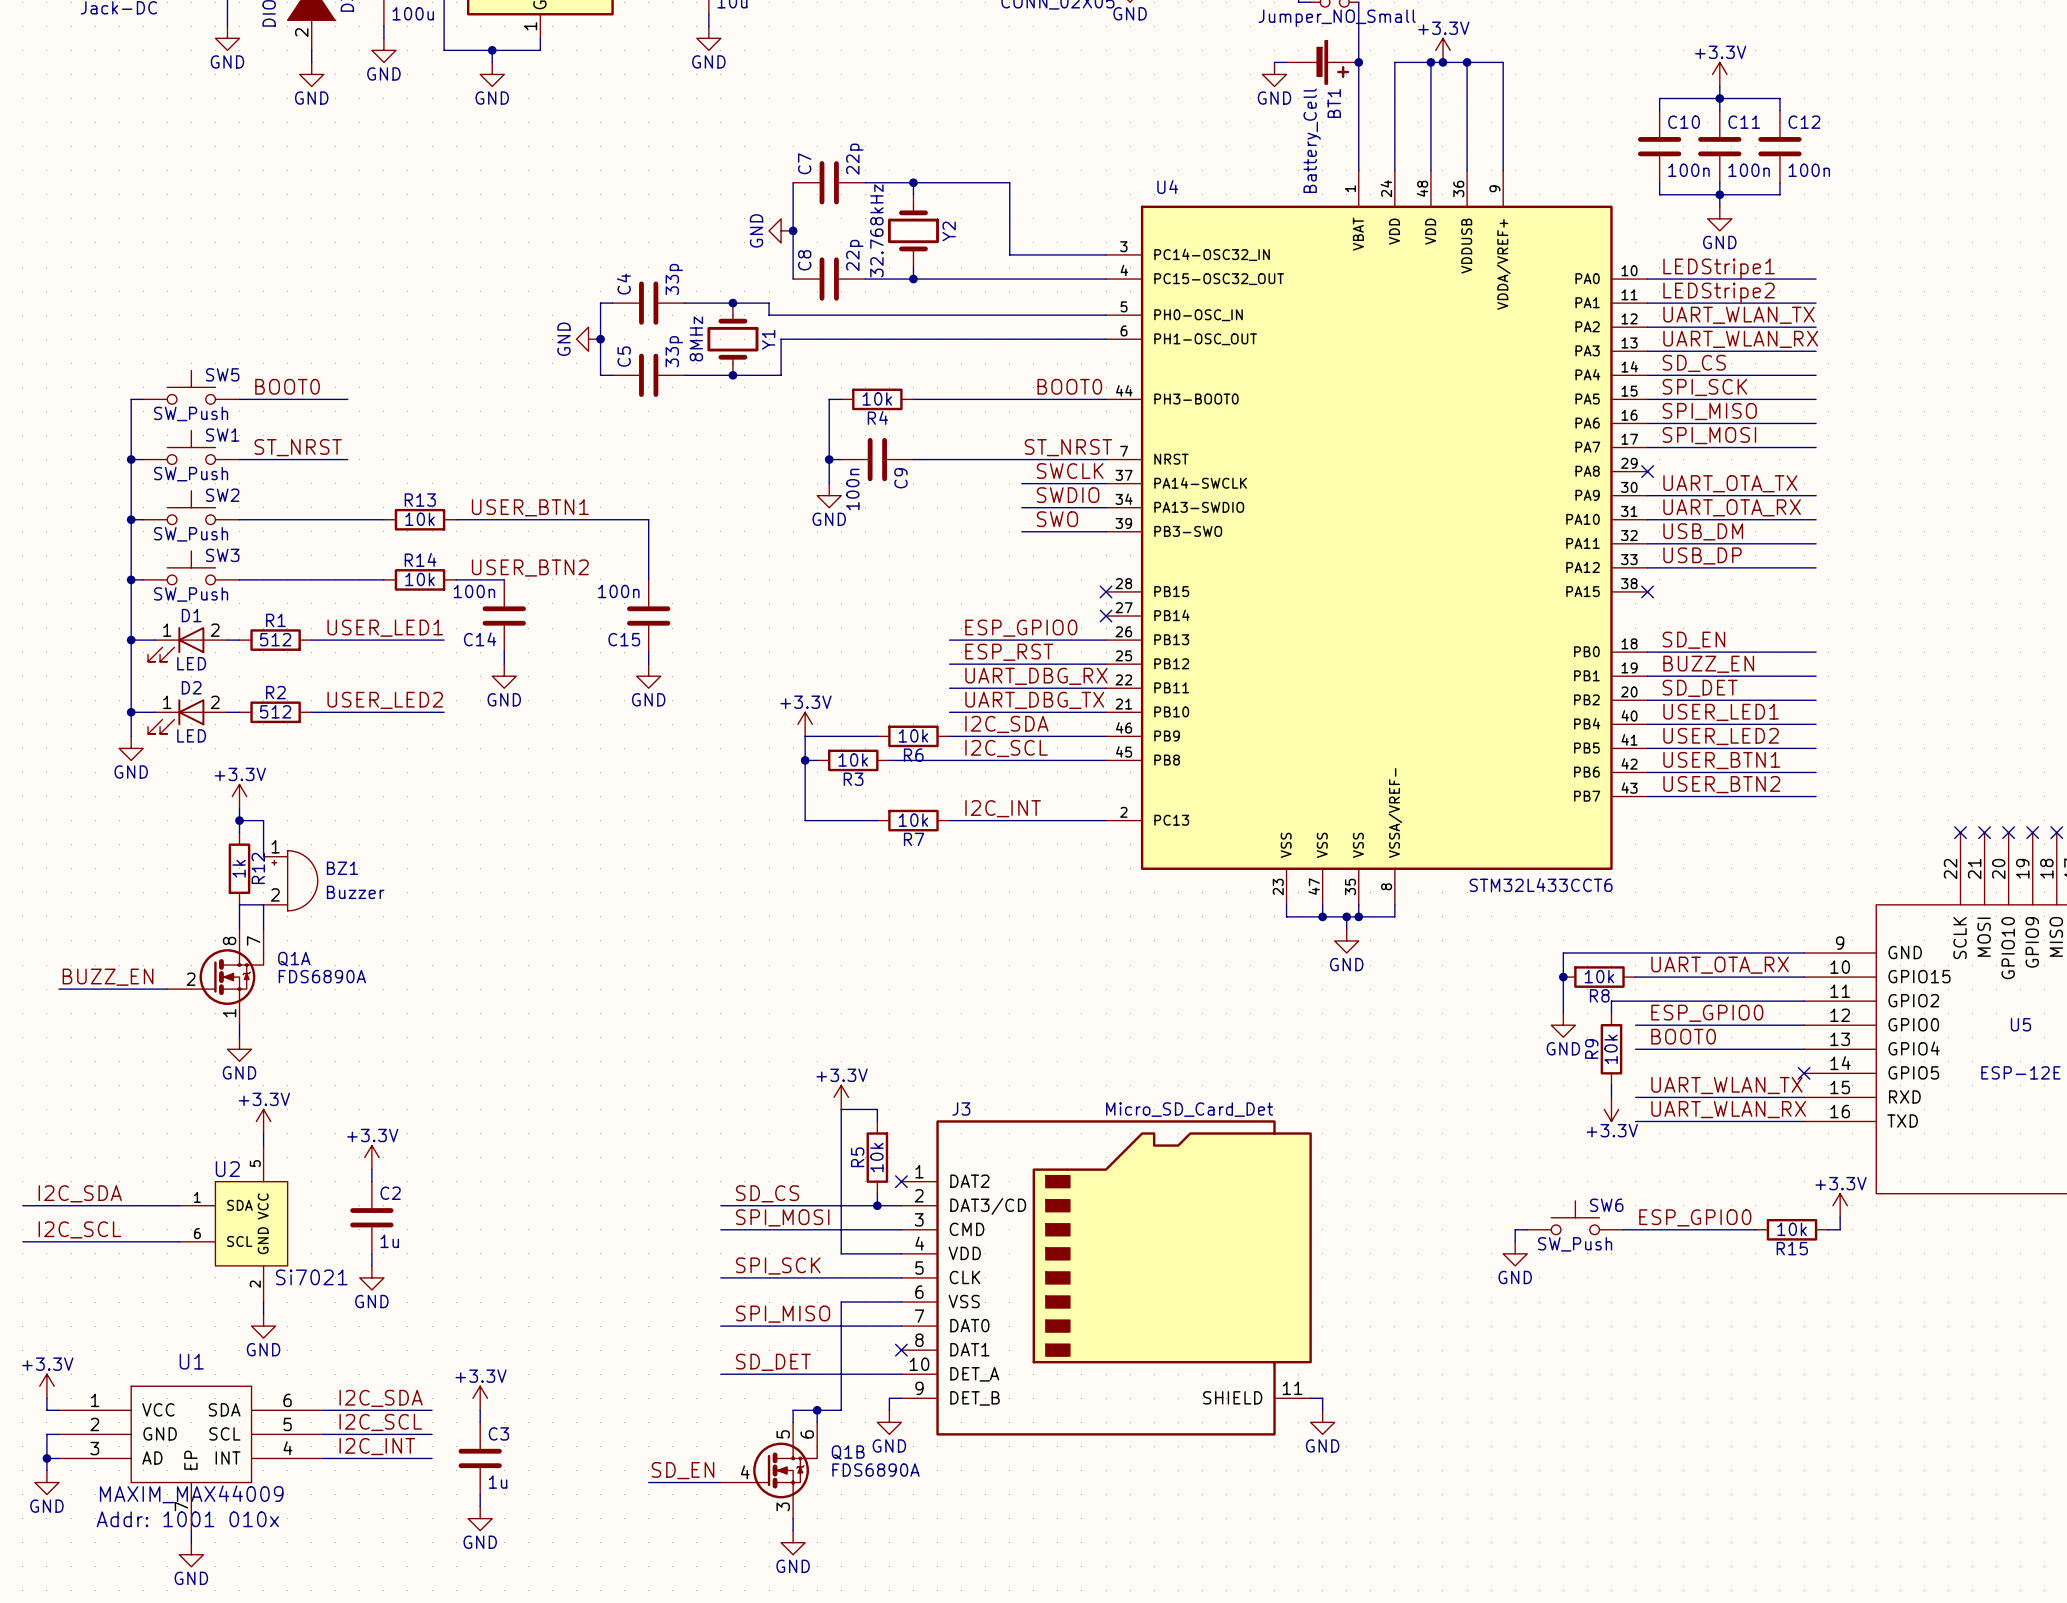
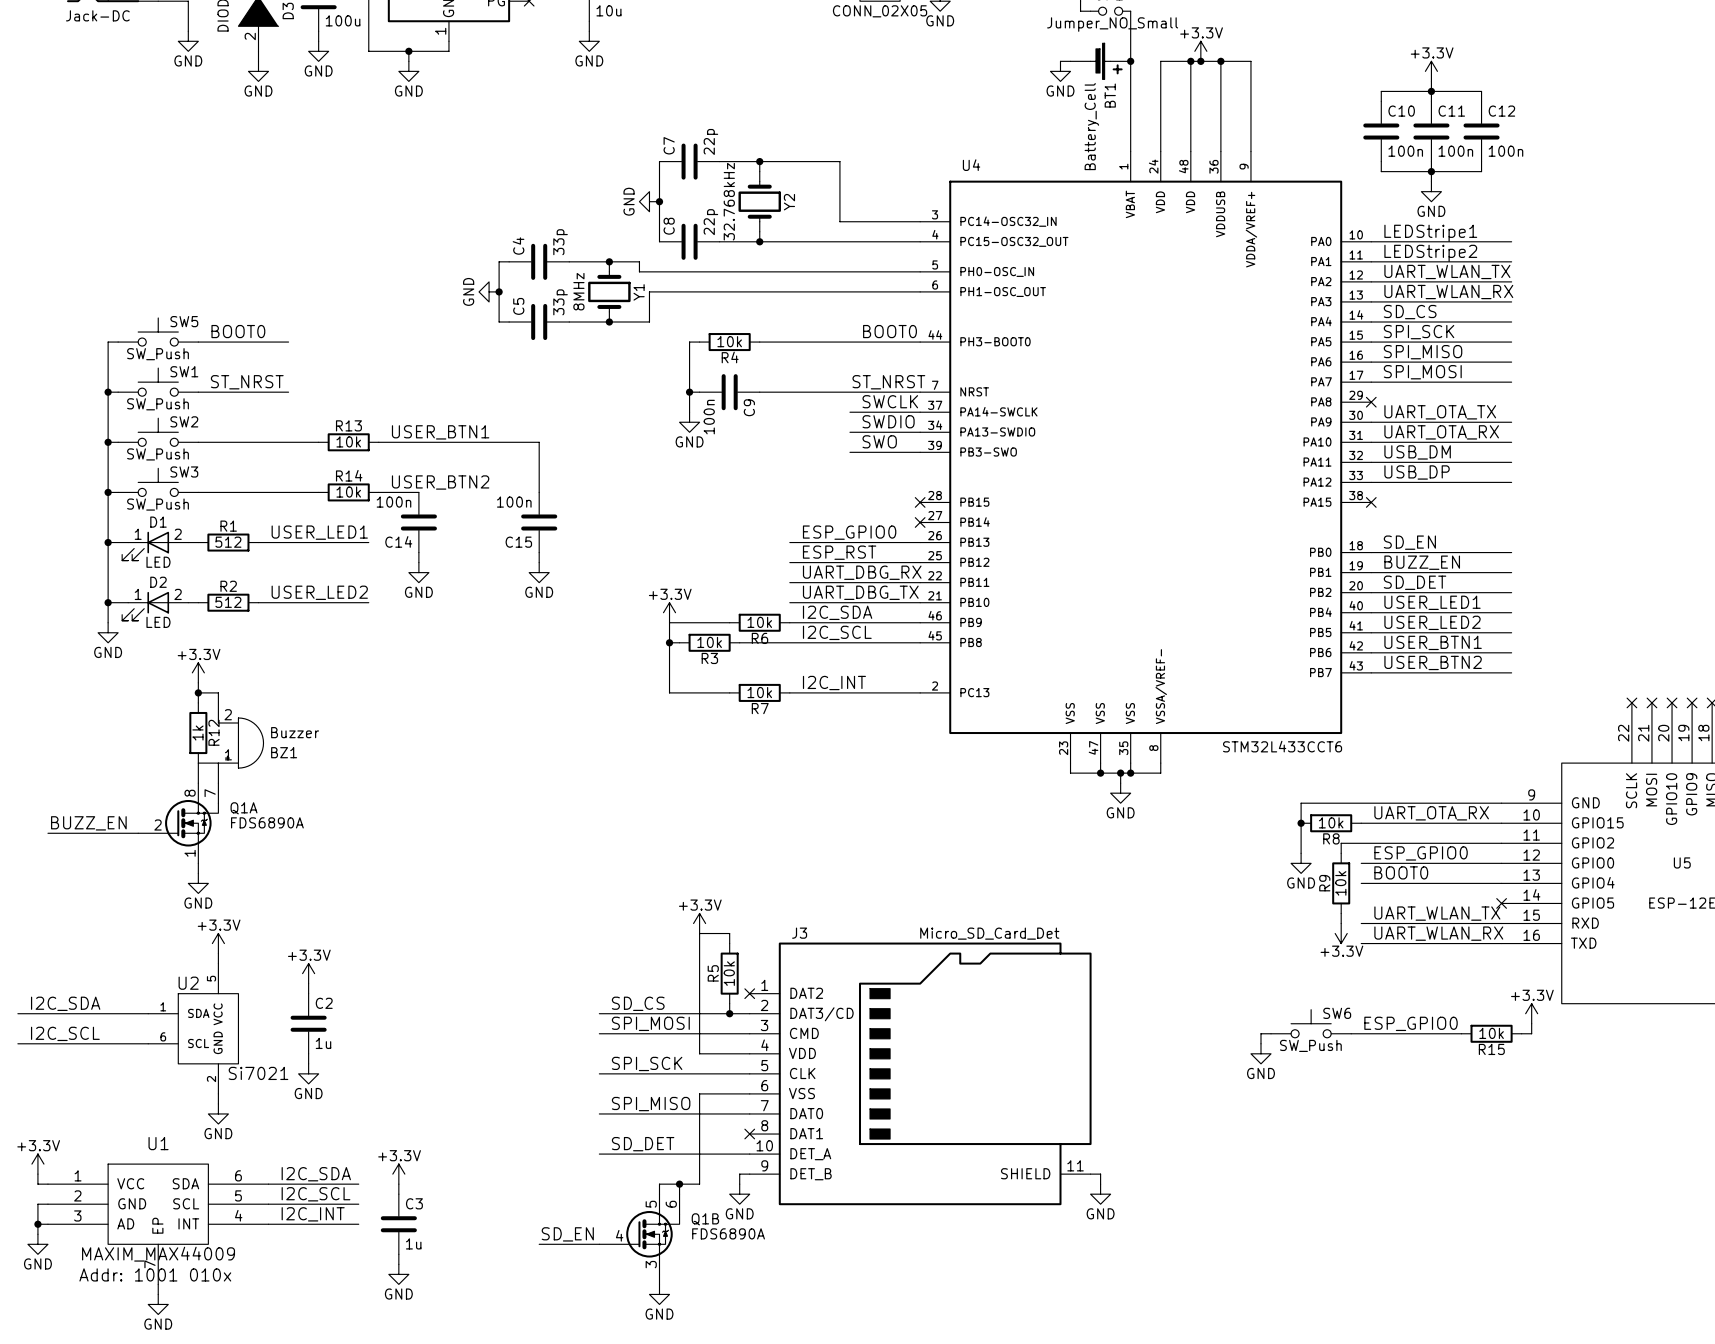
BZ1 flip: as is (294, 880) -> up-down (244, 743)

